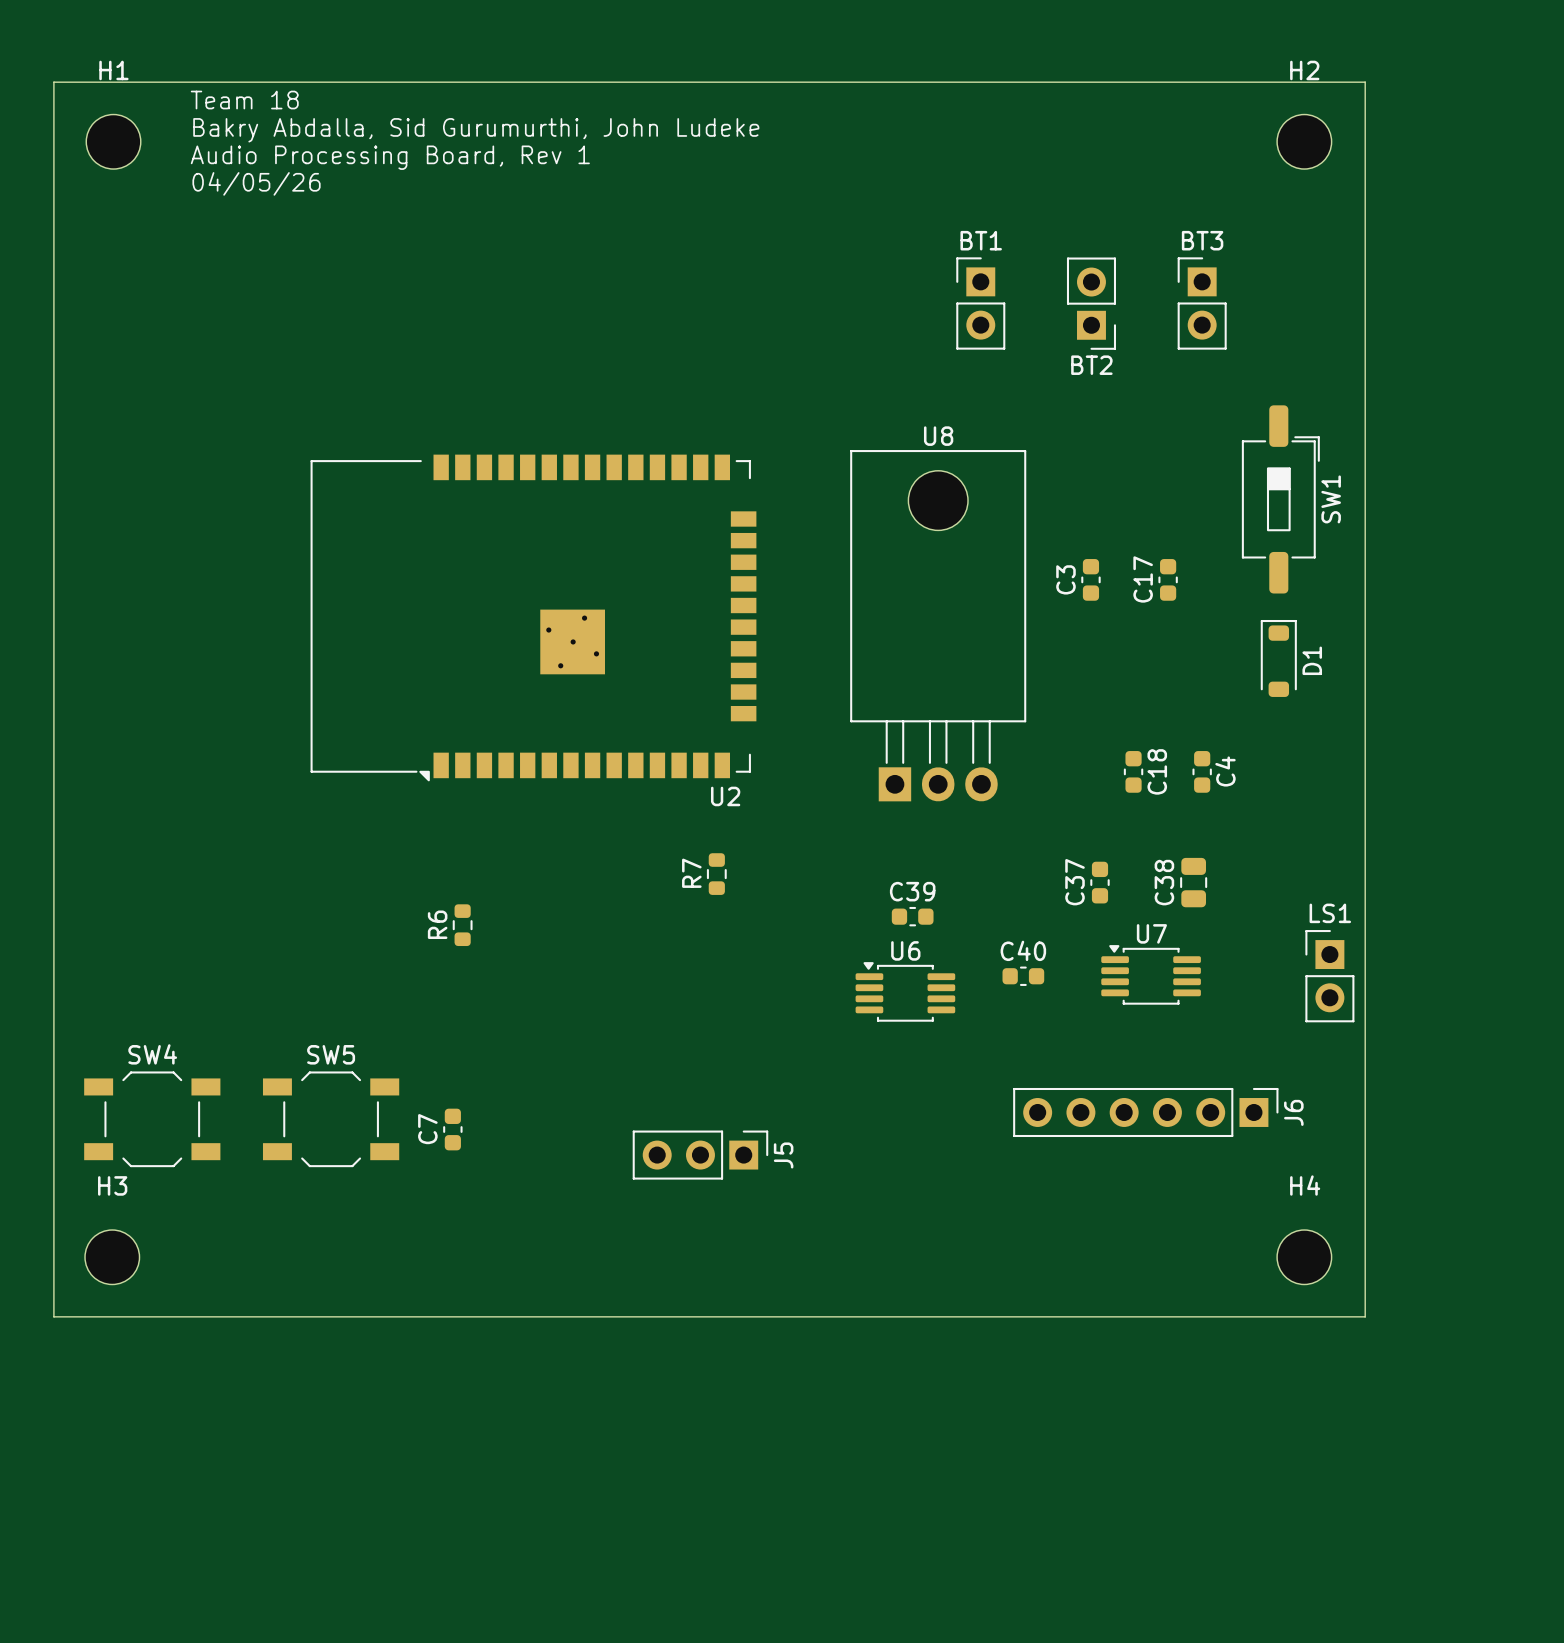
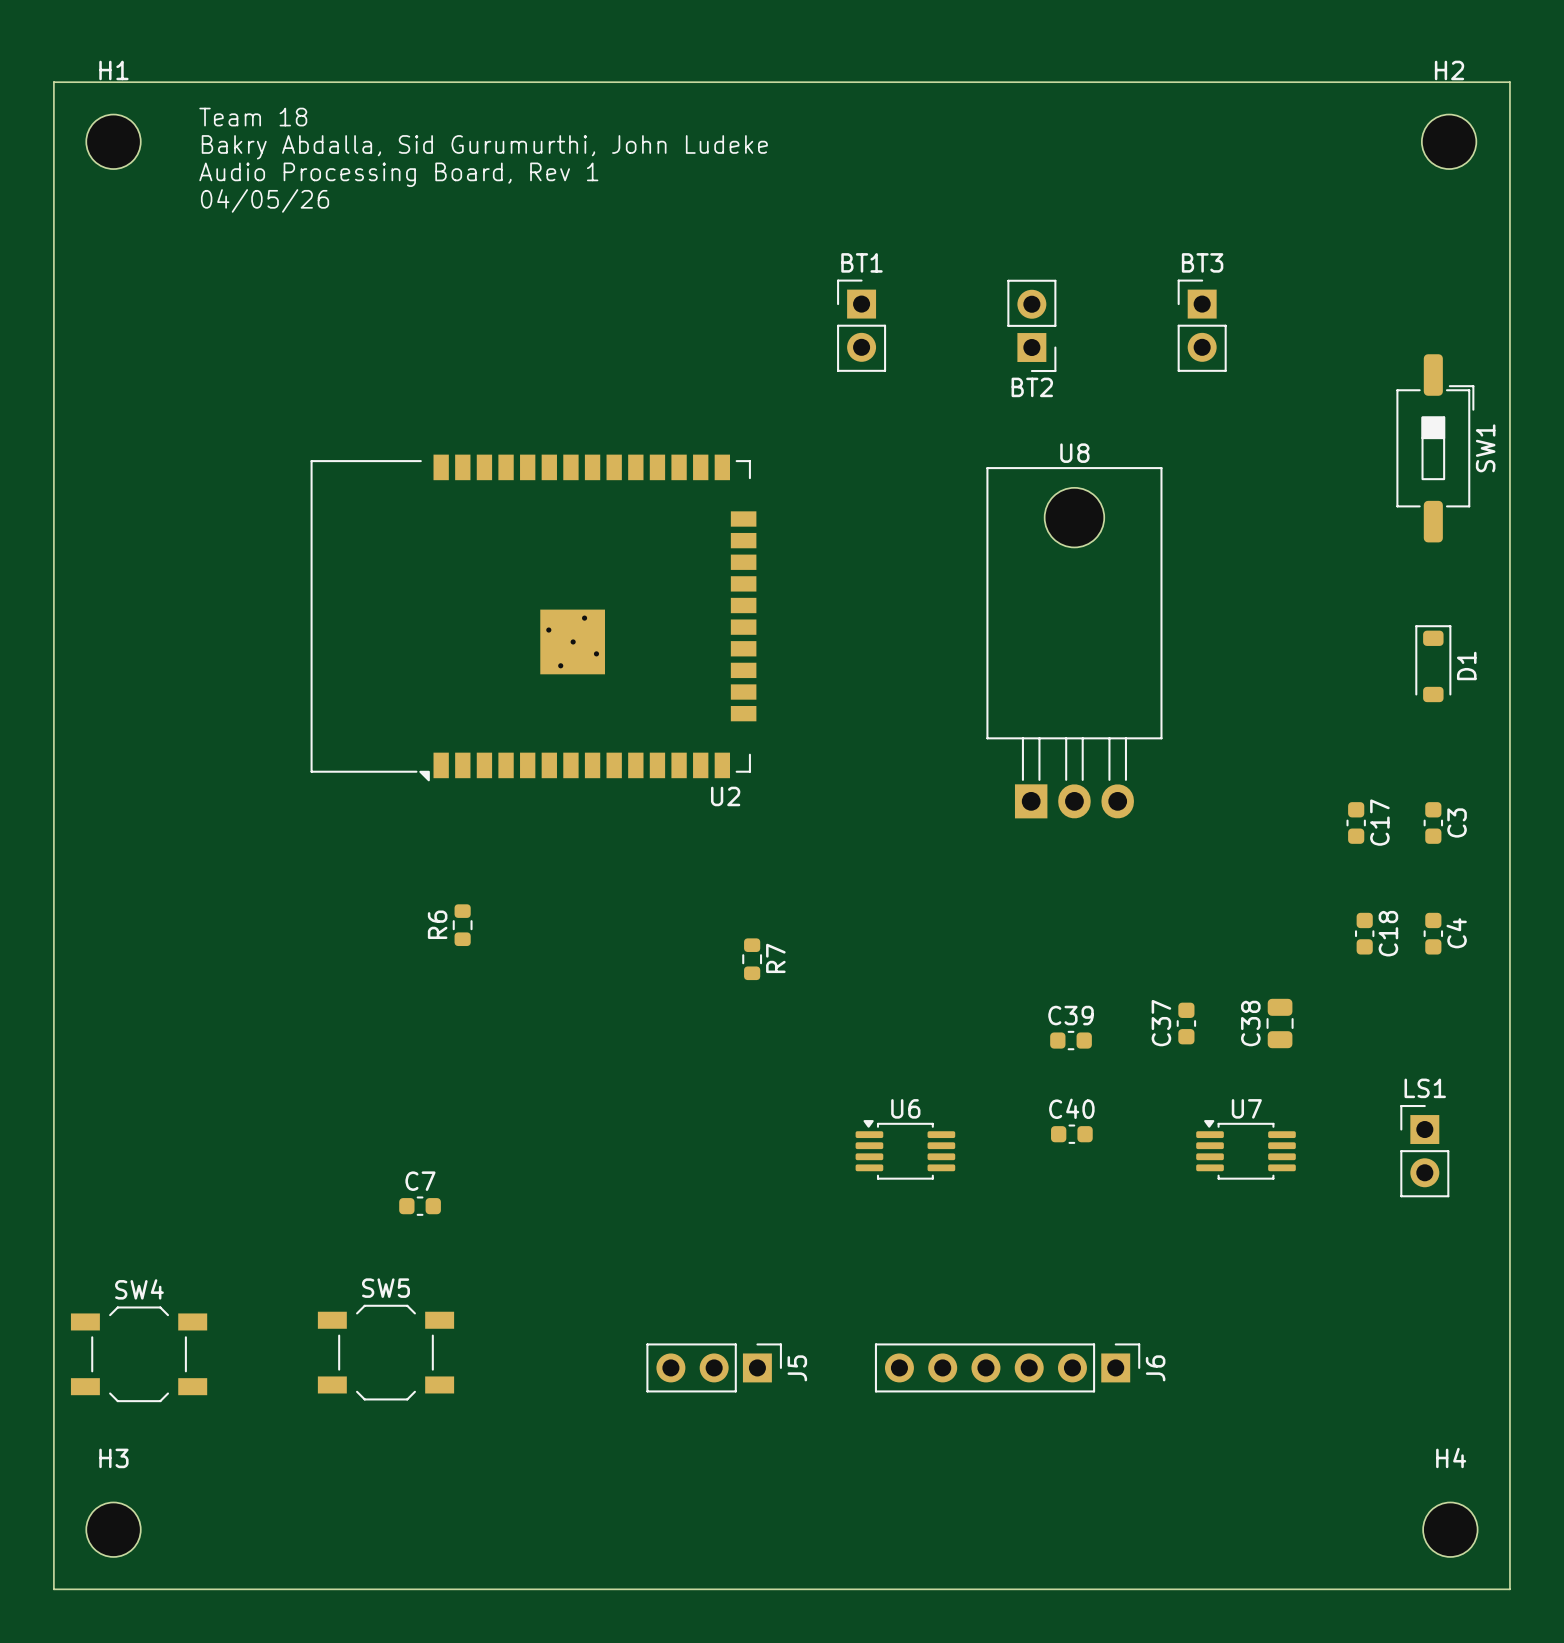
board edge: (1365, 82) (1365, 1316) (53, 1316) -> (1365, 82) (1509, 82) (1509, 1589) (53, 1589) (53, 1316)
text position: Team 18 (244, 100) -> Team 18 (253, 117)
text position: Bakry Abdalla, Sid Gurumurthi, John Ludeke (476, 130) -> Bakry Abdalla, Sid Gurumurthi, John Ludeke (484, 147)
H2 position: (1304, 141) -> (1449, 141)
text position: Audio Processing Board, Rev 1 (390, 157) -> Audio Processing Board, Rev 1 (398, 174)
text position: 04/05/26 (256, 183) -> 04/05/26 (265, 200)
BT1 position: (980, 303) -> (861, 325)
BT2 position: (1091, 303) -> (1031, 325)
BT3 position: (1202, 303) -> (1202, 325)
SW1 position: (1280, 499) -> (1435, 448)
C3 name position: C3 (1065, 579) -> C3 (1457, 822)
C3 position: (1090, 579) -> (1433, 822)
C17 name position: C17 (1143, 579) -> C17 (1379, 822)
C17 position: (1168, 579) -> (1356, 822)
U8 position: (938, 625) -> (1074, 642)
D1 position: (1278, 658) -> (1433, 663)
C18 position: (1133, 771) -> (1364, 933)
C4 position: (1202, 771) -> (1433, 933)
R7 name position: R7 (691, 873) -> R7 (775, 958)
R7 position: (716, 874) -> (752, 959)
C37 position: (1099, 882) -> (1186, 1023)
C38 position: (1193, 882) -> (1280, 1023)
C39 position: (912, 916) -> (1071, 1040)
U7 position: (1151, 974) -> (1246, 1149)
C40 position: (1023, 976) -> (1071, 1134)
LS1 position: (1329, 976) -> (1424, 1151)
U6 position: (905, 991) -> (905, 1149)
J6 position: (1145, 1112) -> (1007, 1367)
SW4 position: (152, 1119) -> (139, 1354)
SW5 position: (331, 1119) -> (386, 1352)
C7 rotation: 0° (452, 1129) -> 90° clockwise (420, 1206)
C7 position: (452, 1129) -> (420, 1206)
J5 position: (700, 1155) -> (714, 1367)
H3 position: (112, 1257) -> (113, 1529)
H4 position: (1304, 1257) -> (1450, 1529)

